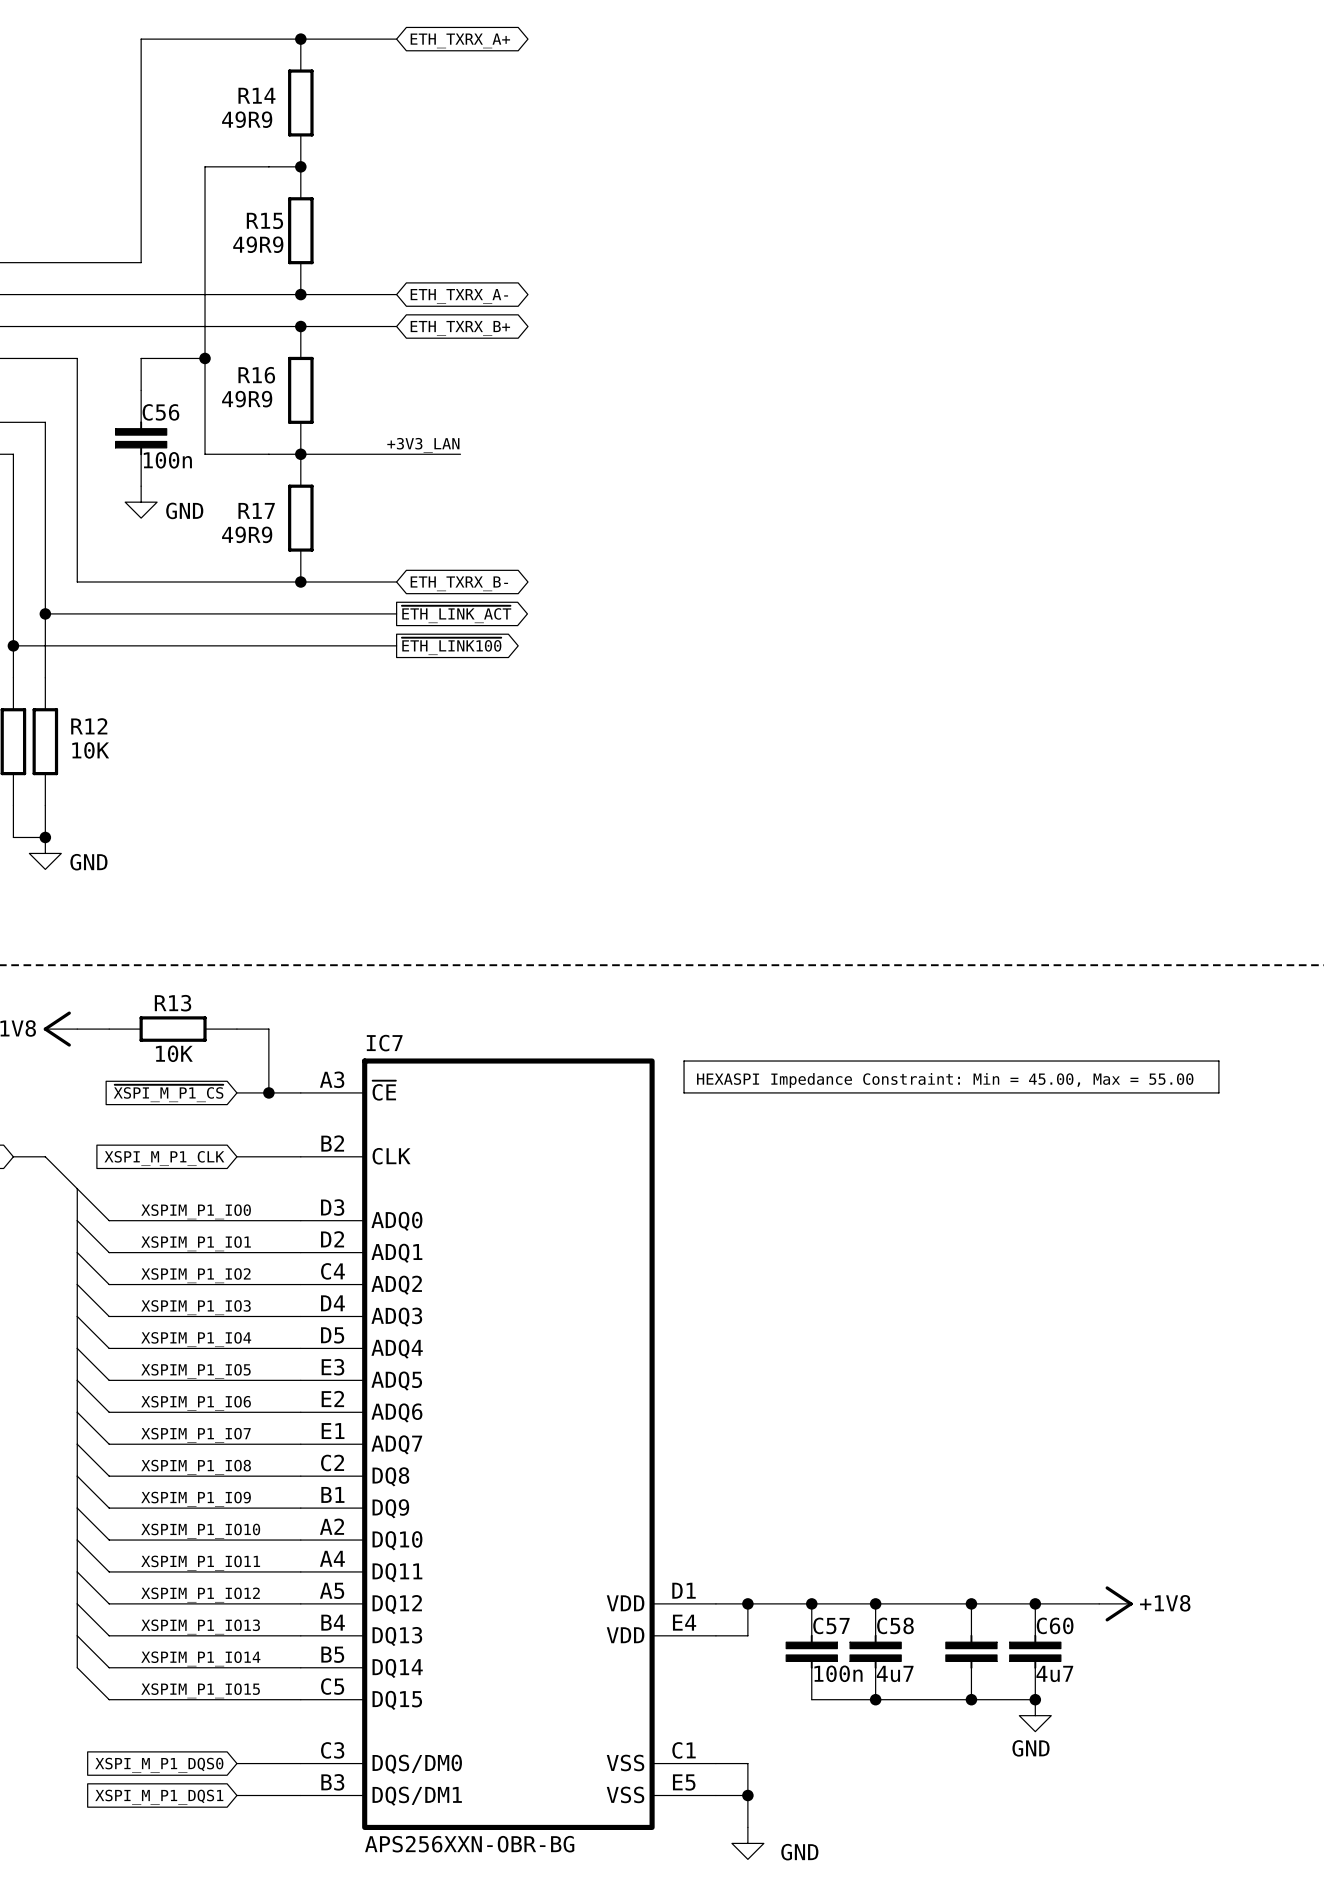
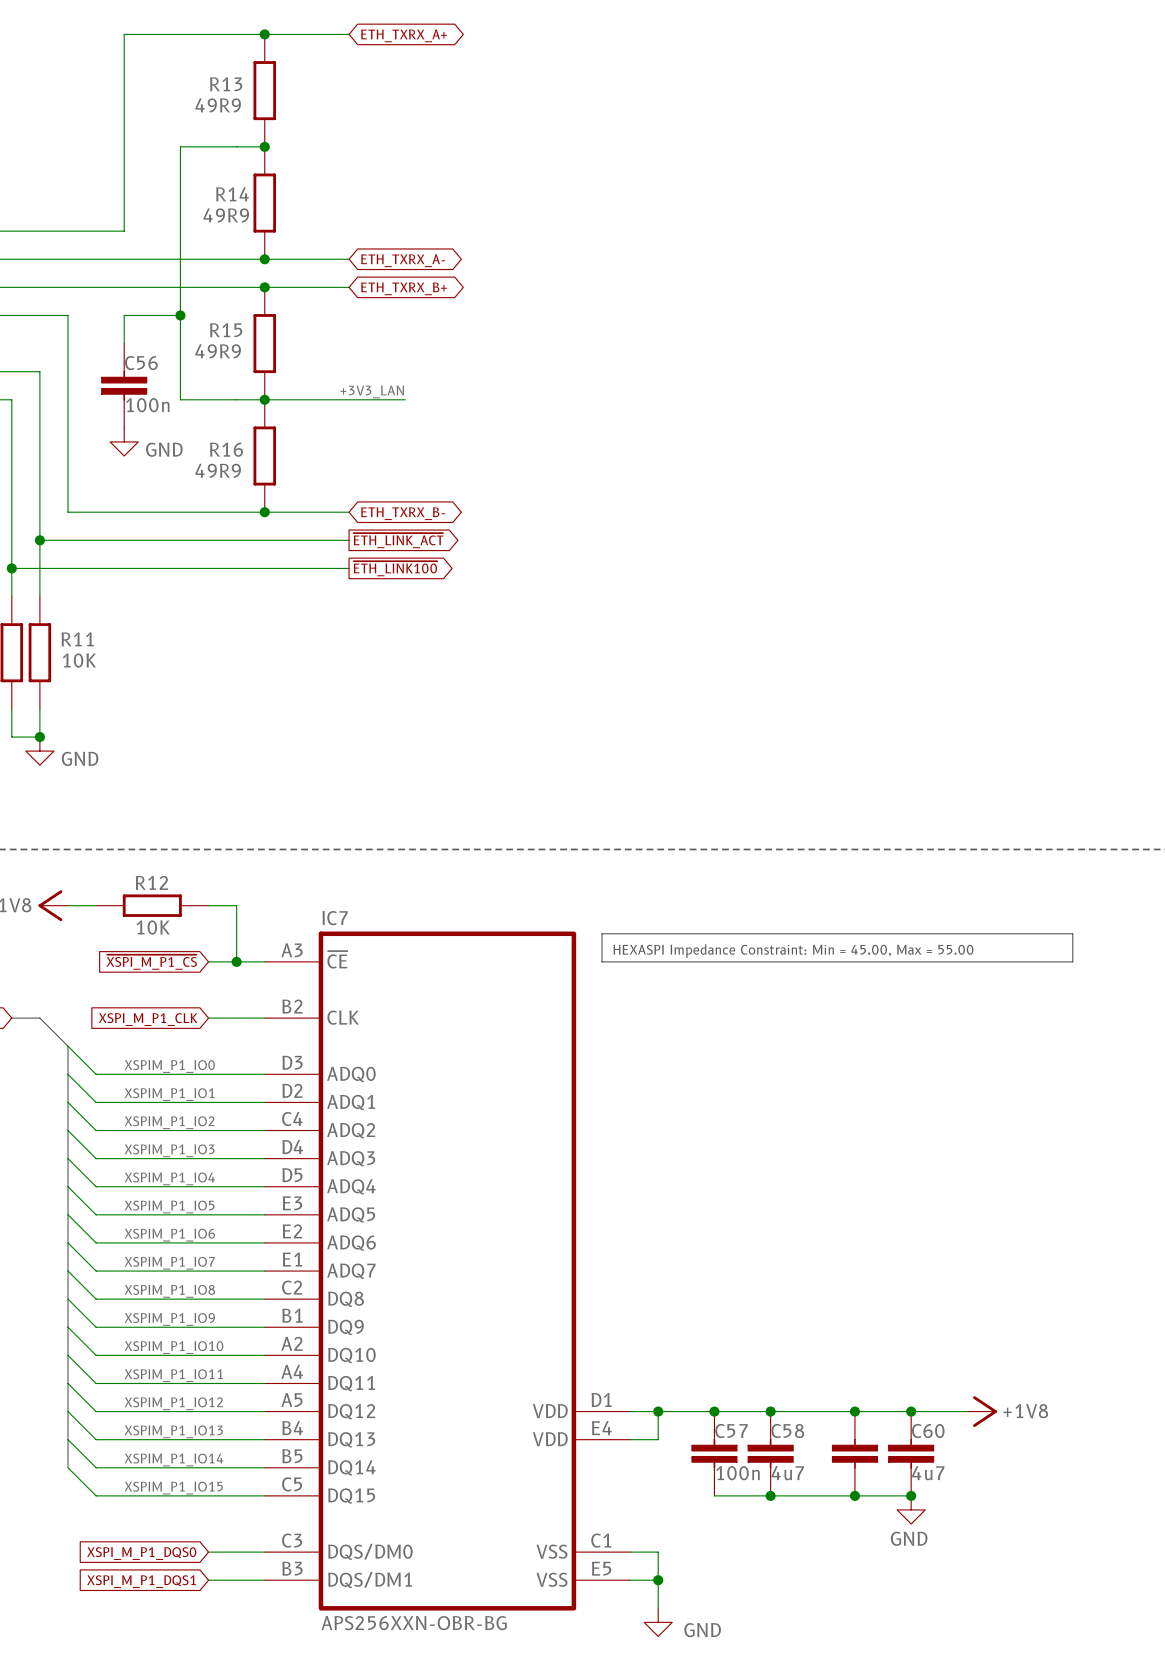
R14 name: R14 (256, 95) -> R13 (226, 84)
R15 name: R15 (264, 220) -> R14 (232, 194)
R16 name: R16 (256, 375) -> R15 (226, 330)
R17 name: R17 (256, 510) -> R16 (226, 449)
R12 name: R12 (89, 726) -> R11 (77, 639)
R13 name: R13 (173, 1003) -> R12 (151, 882)

